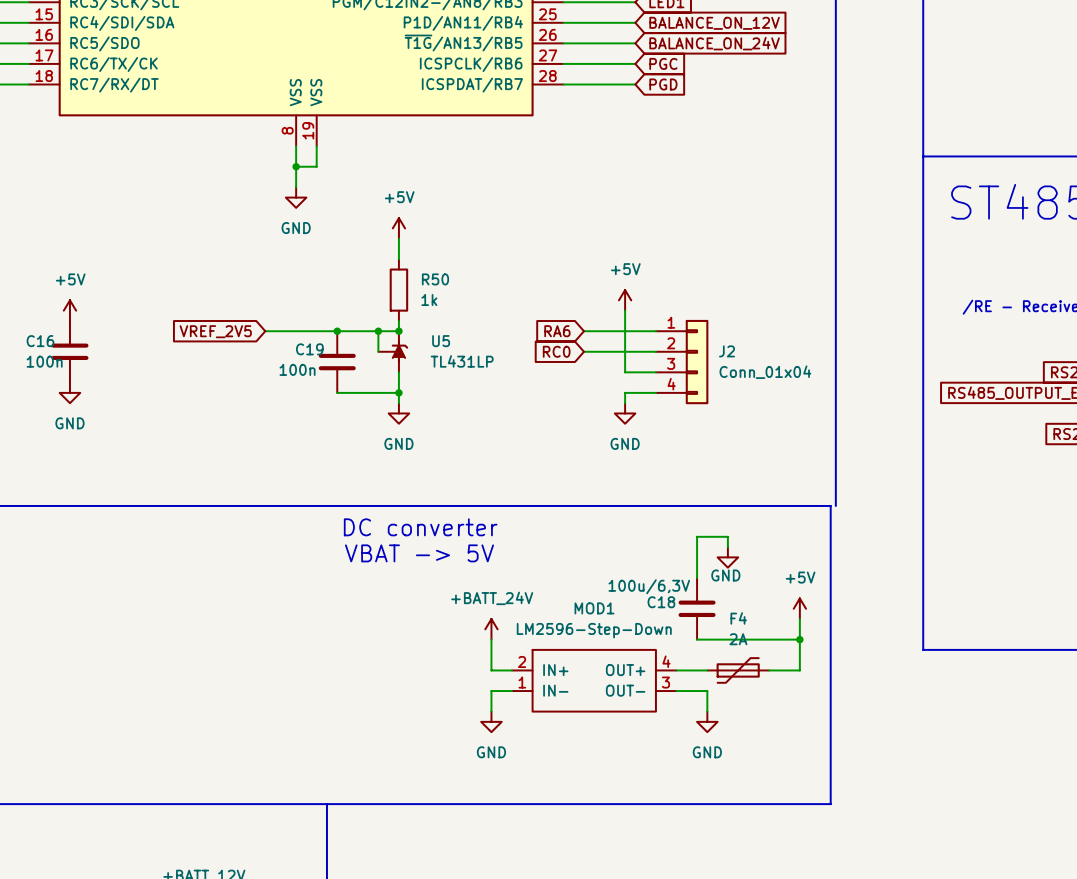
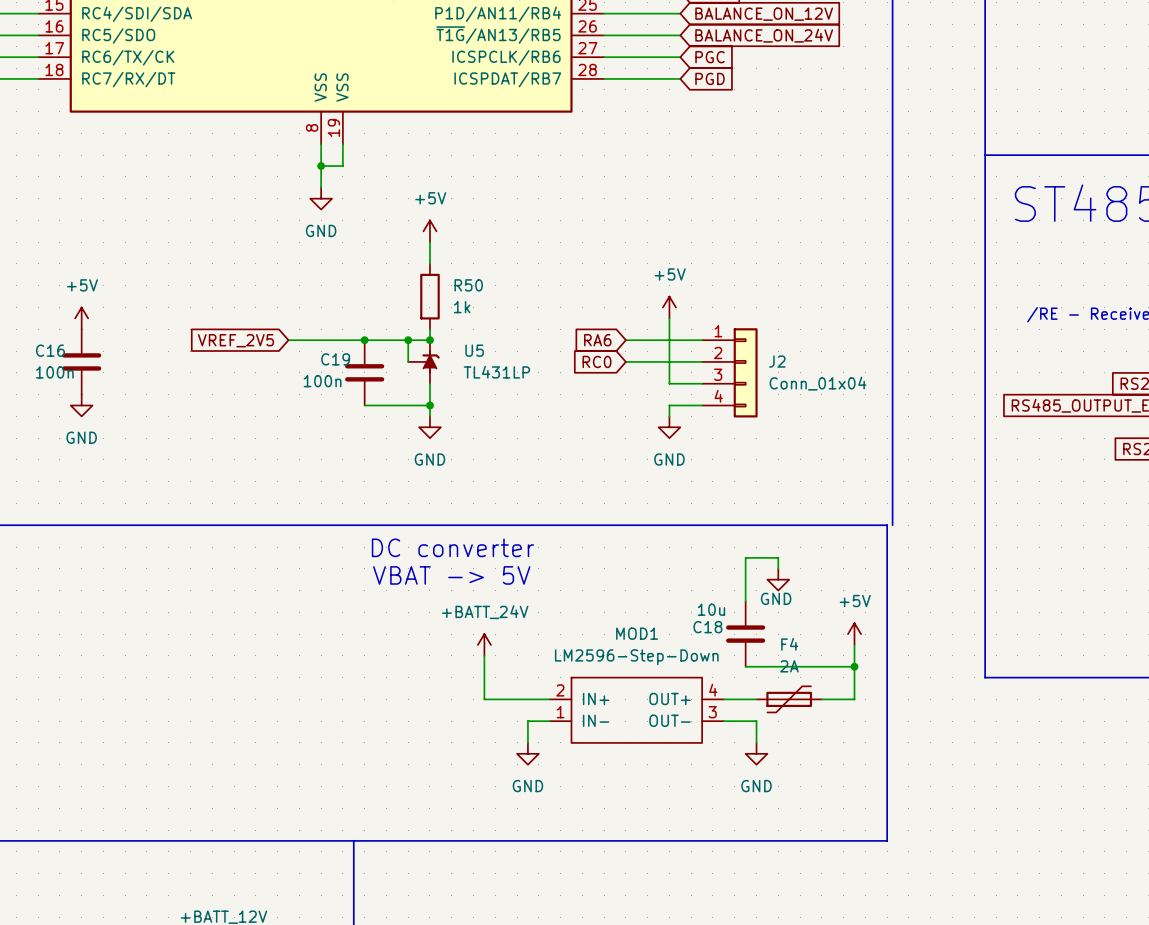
C18 value: 100u/6,3V (649, 586) -> 10u (711, 609)
power symbol position: +BATT_24V (491, 629) -> +BATT_24V (484, 644)
wire: (491, 639) (491, 670) -> (484, 655) (484, 699) (527, 699)

